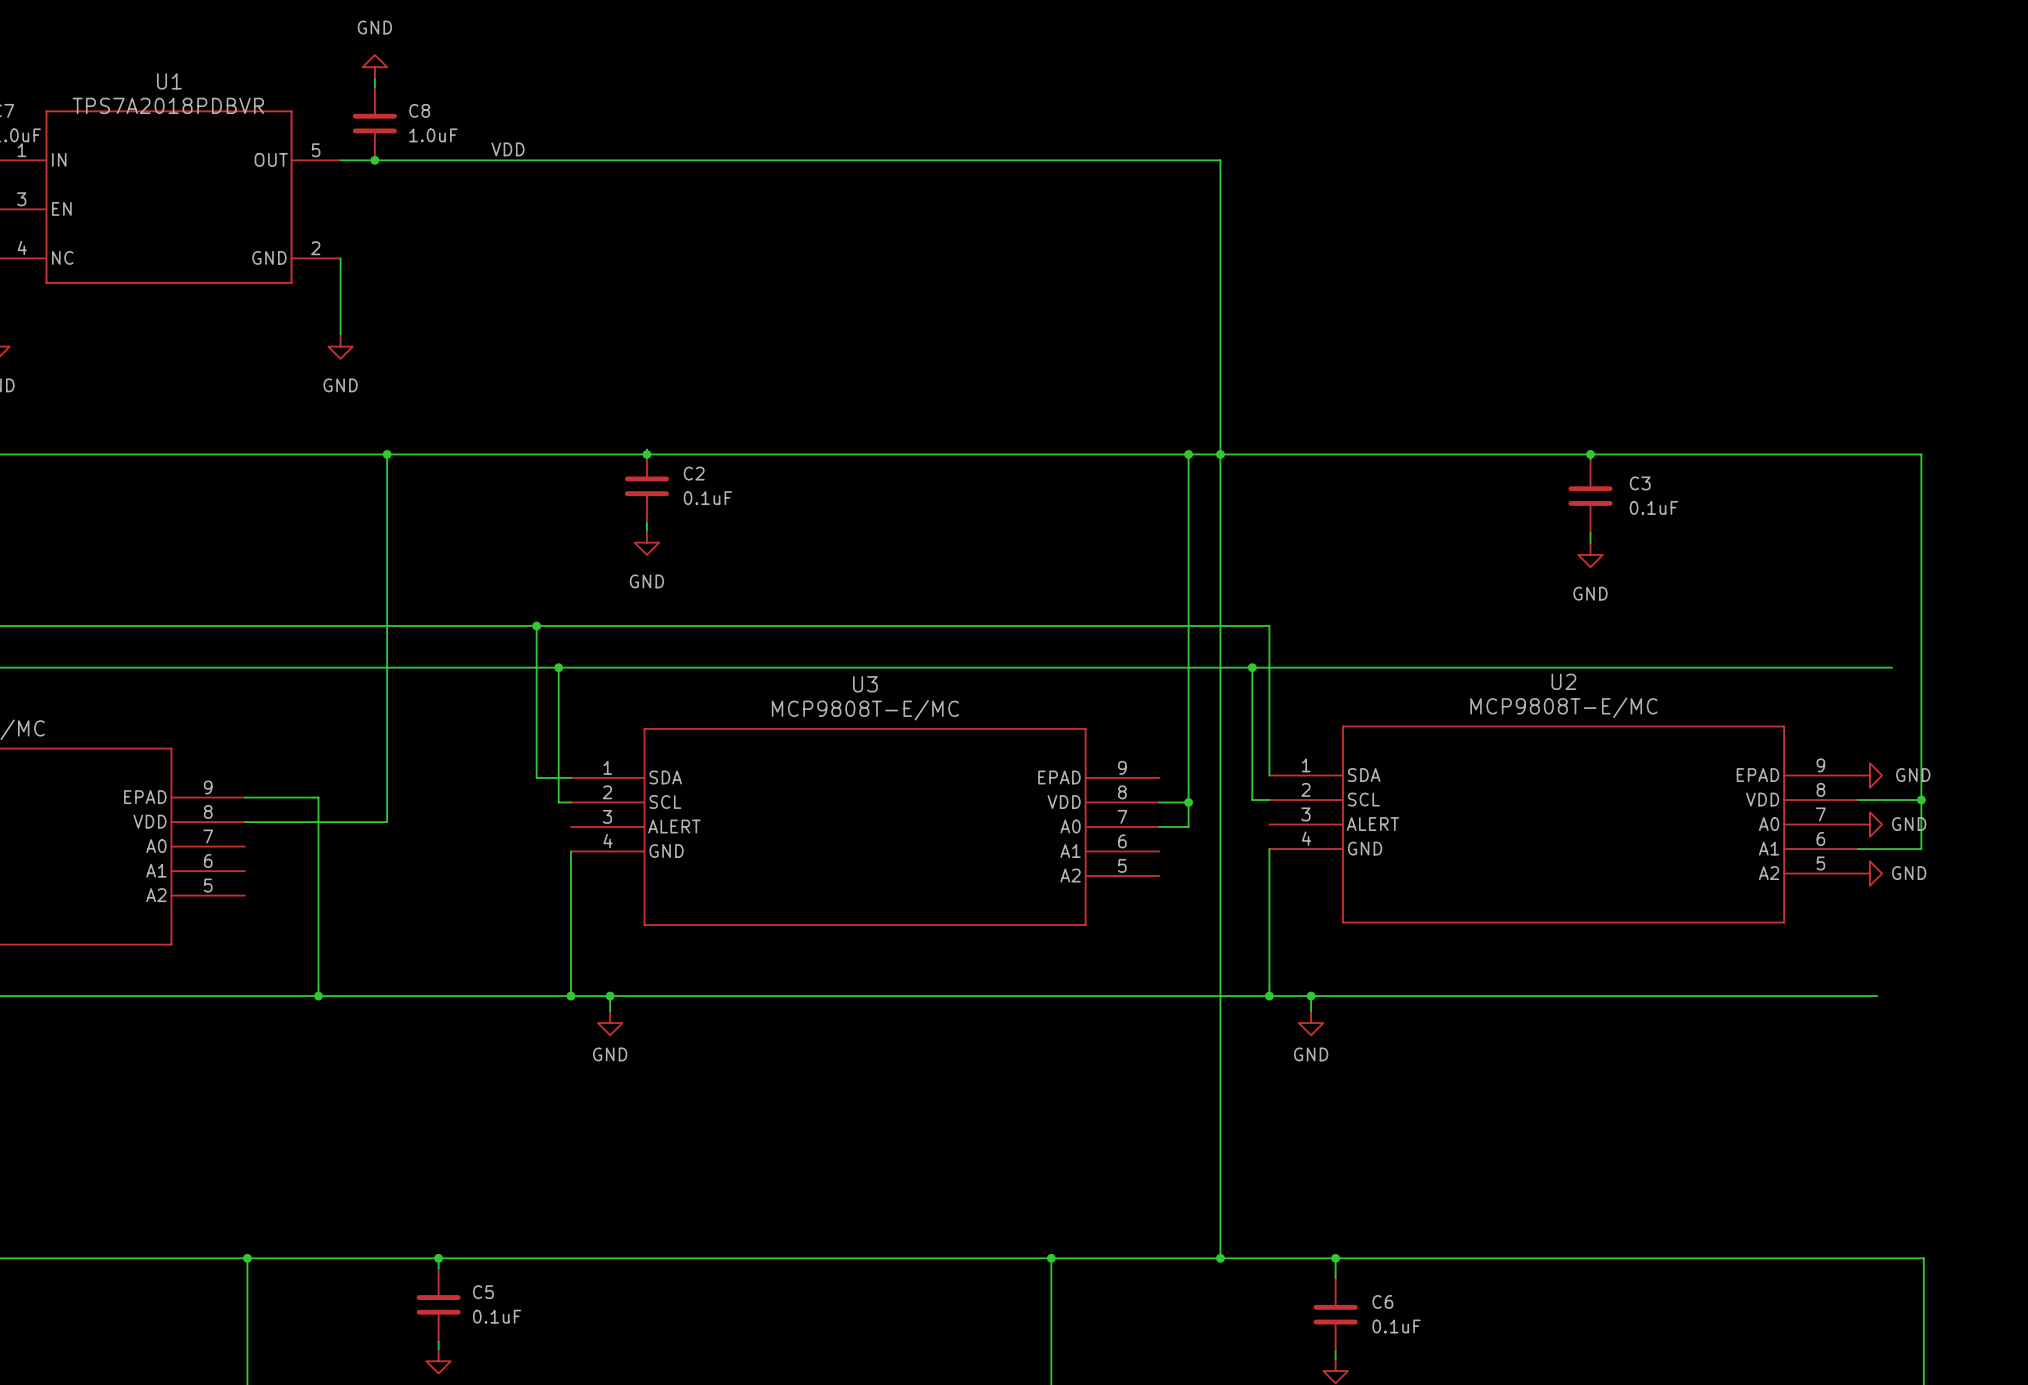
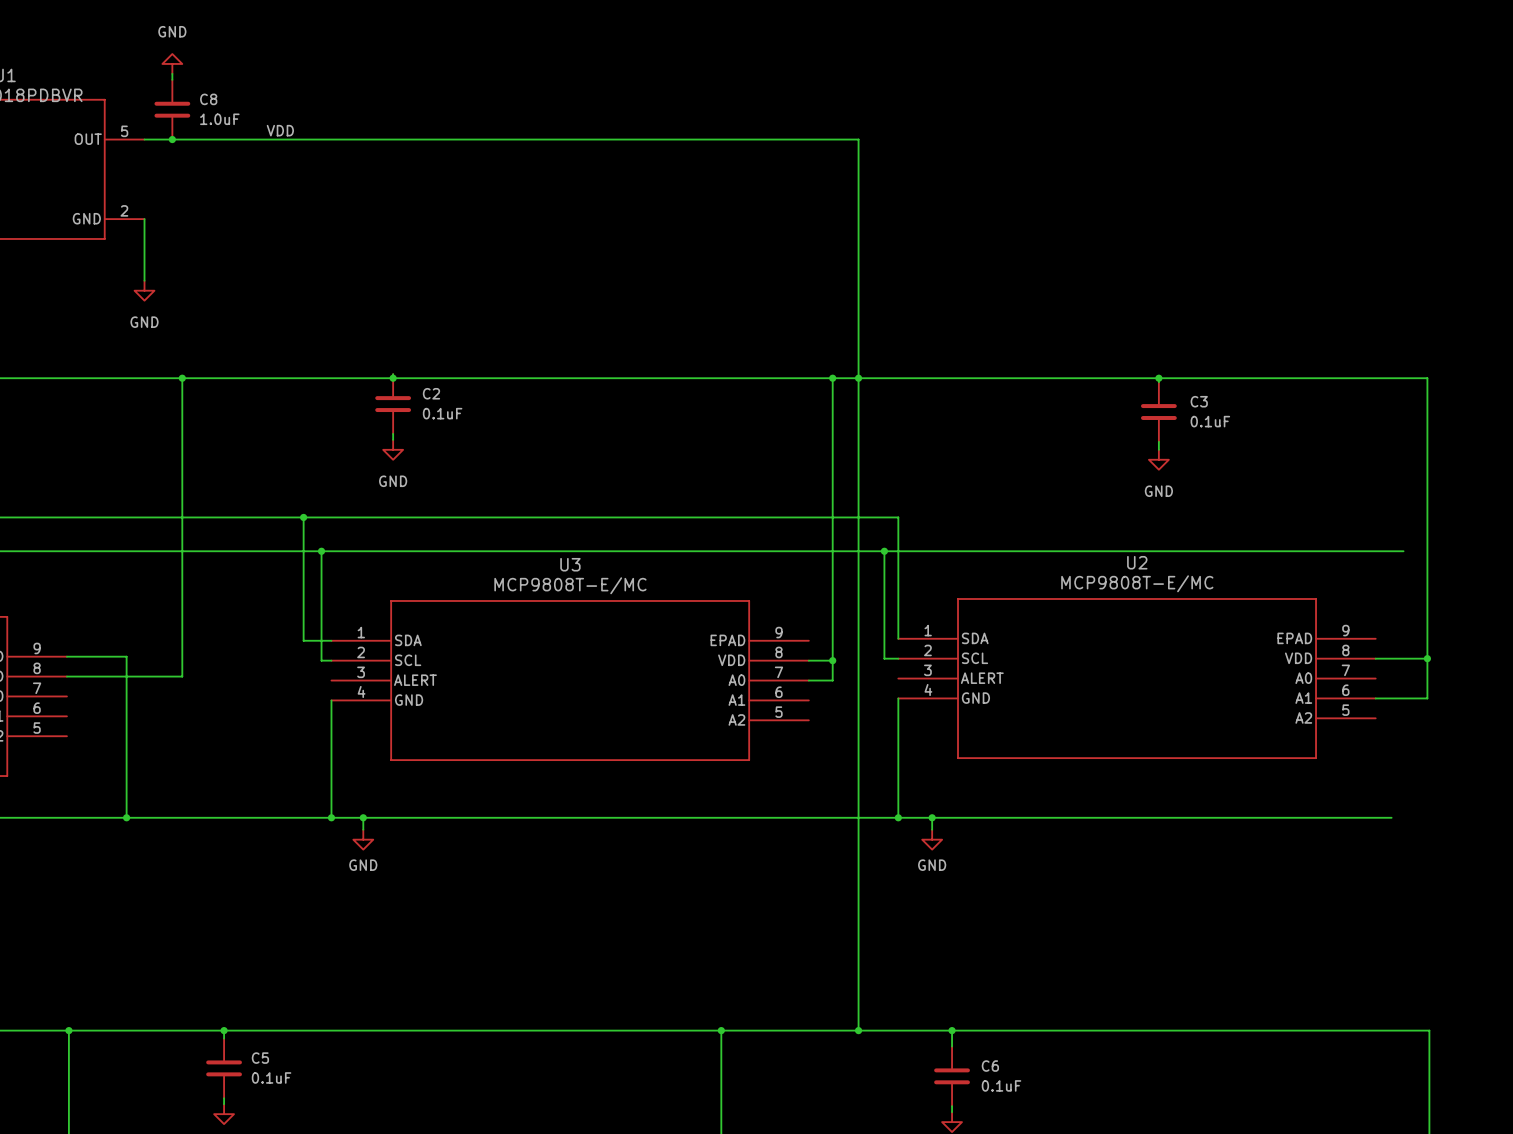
power symbol: GND (1869, 775) -> none
power symbol: GND (1869, 824) -> none
power symbol: GND (1869, 873) -> none

